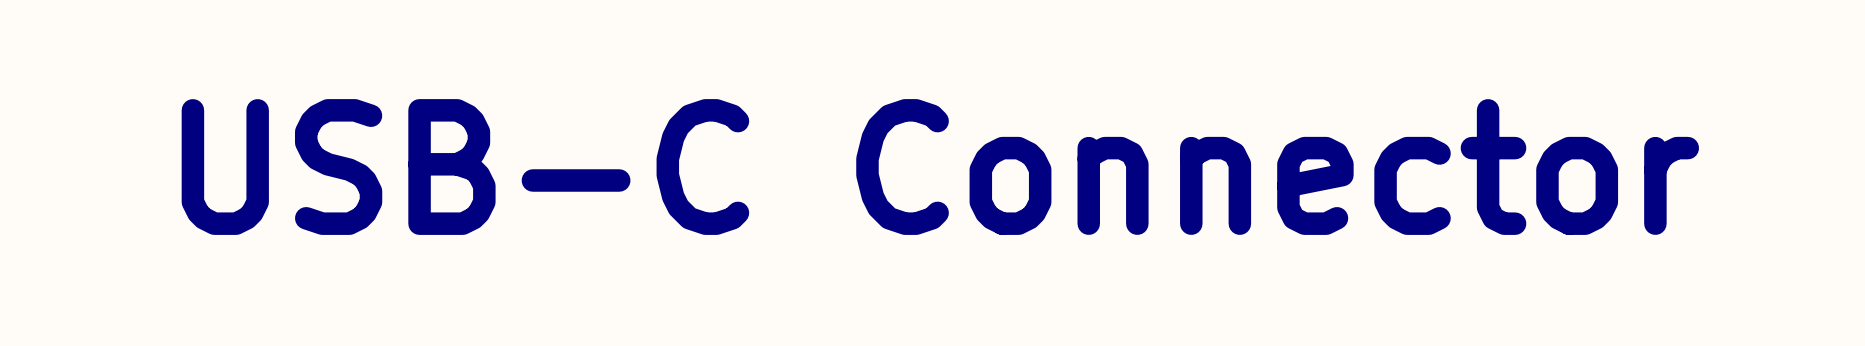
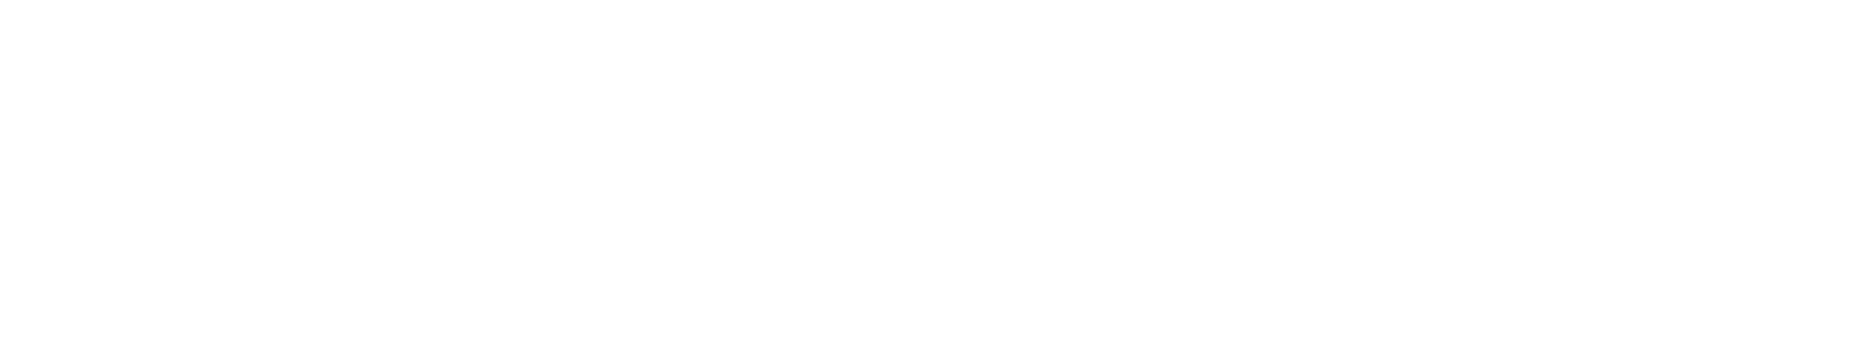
text: USB-C Connector (940, 167) -> none

